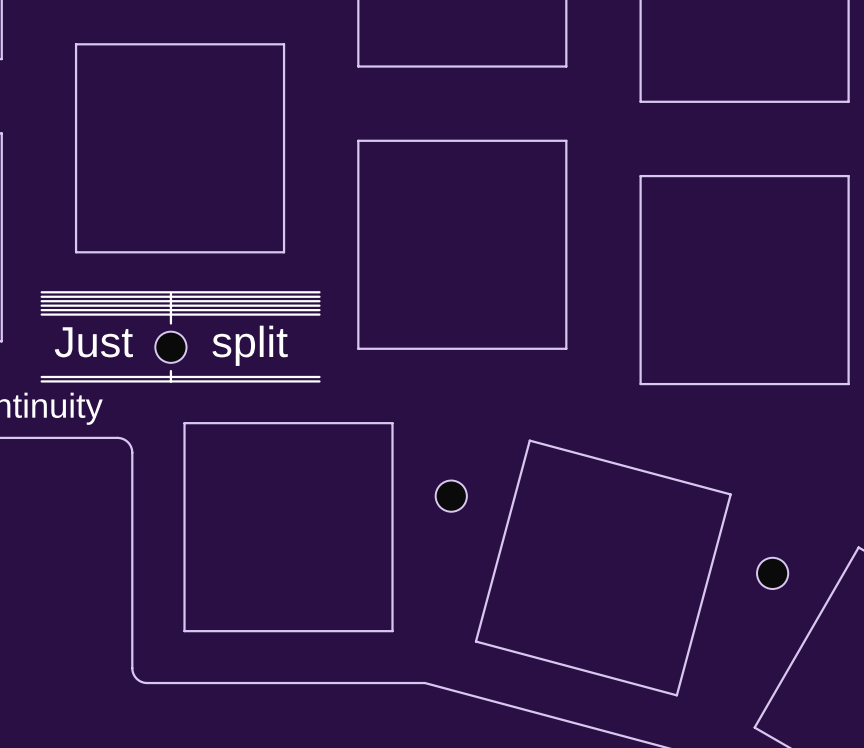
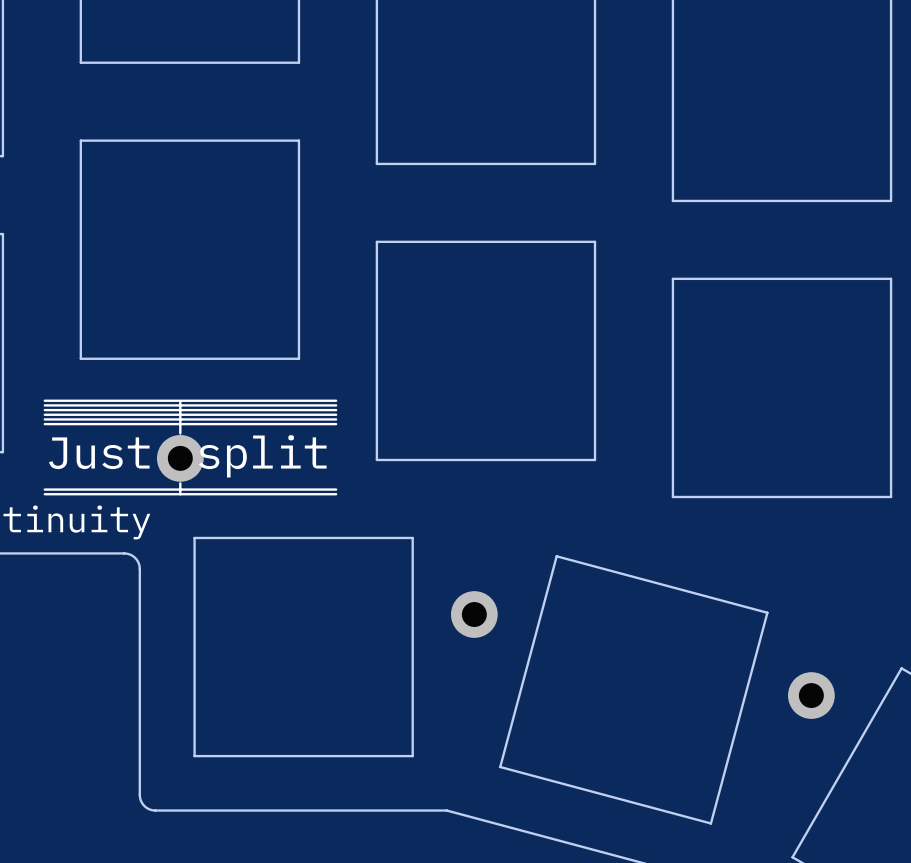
part: (170, 347) -> none
via: none -> (180, 458)
part: (451, 496) -> none
via: none -> (474, 614)
part: (772, 573) -> none
via: none -> (811, 695)

